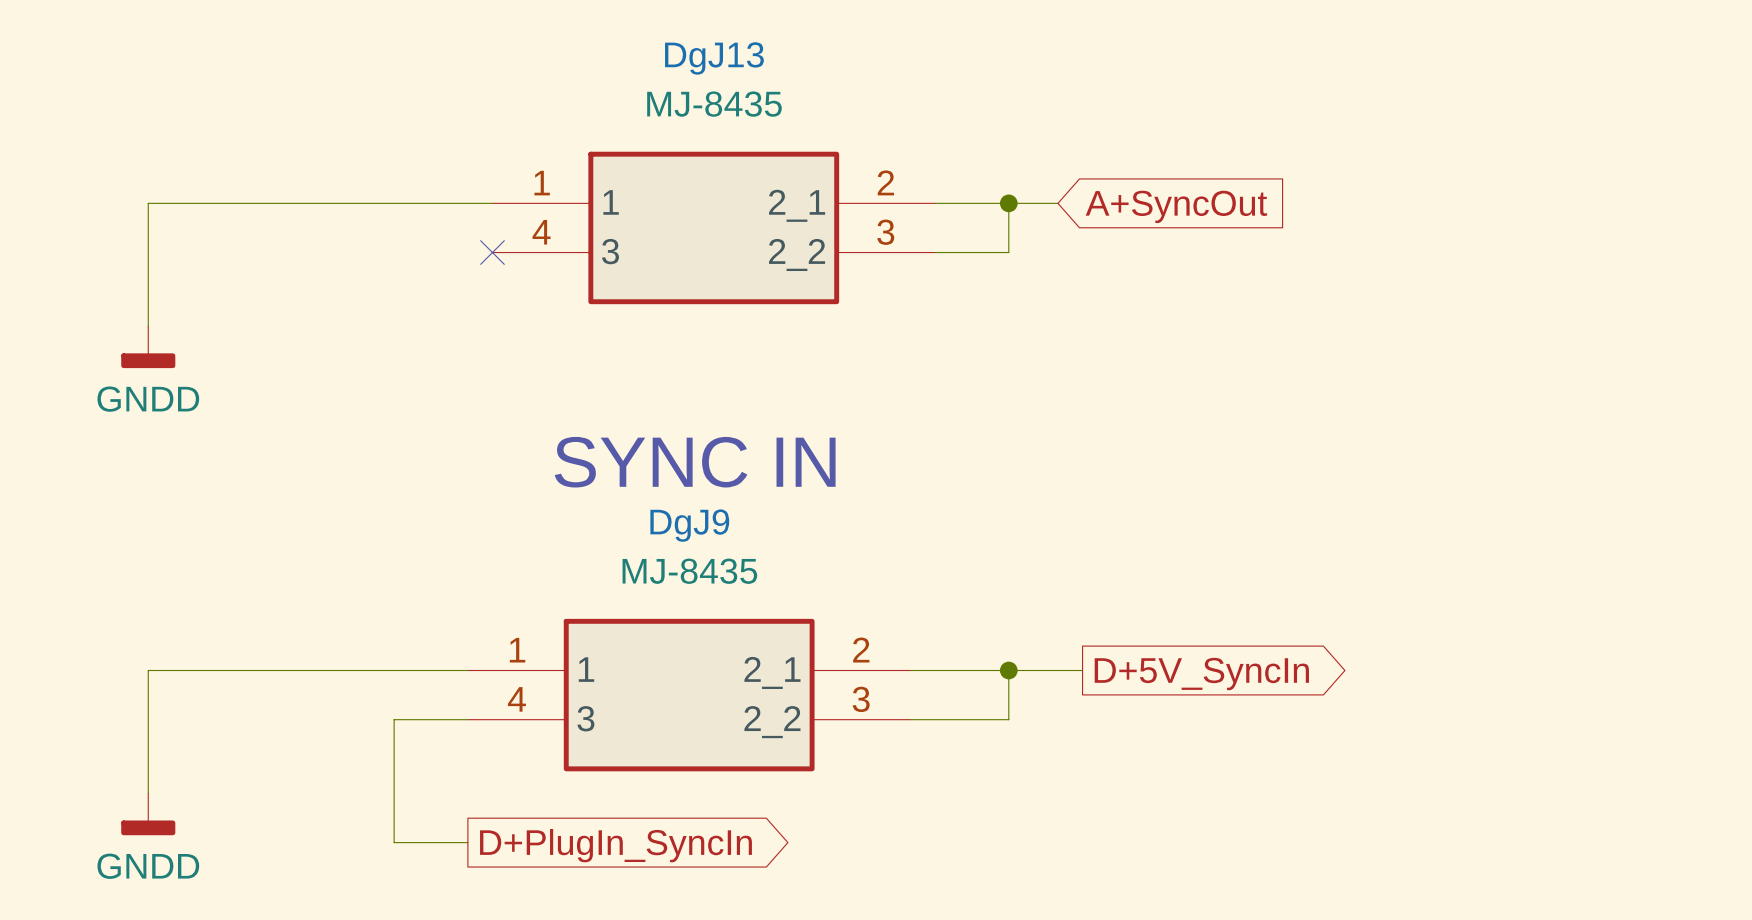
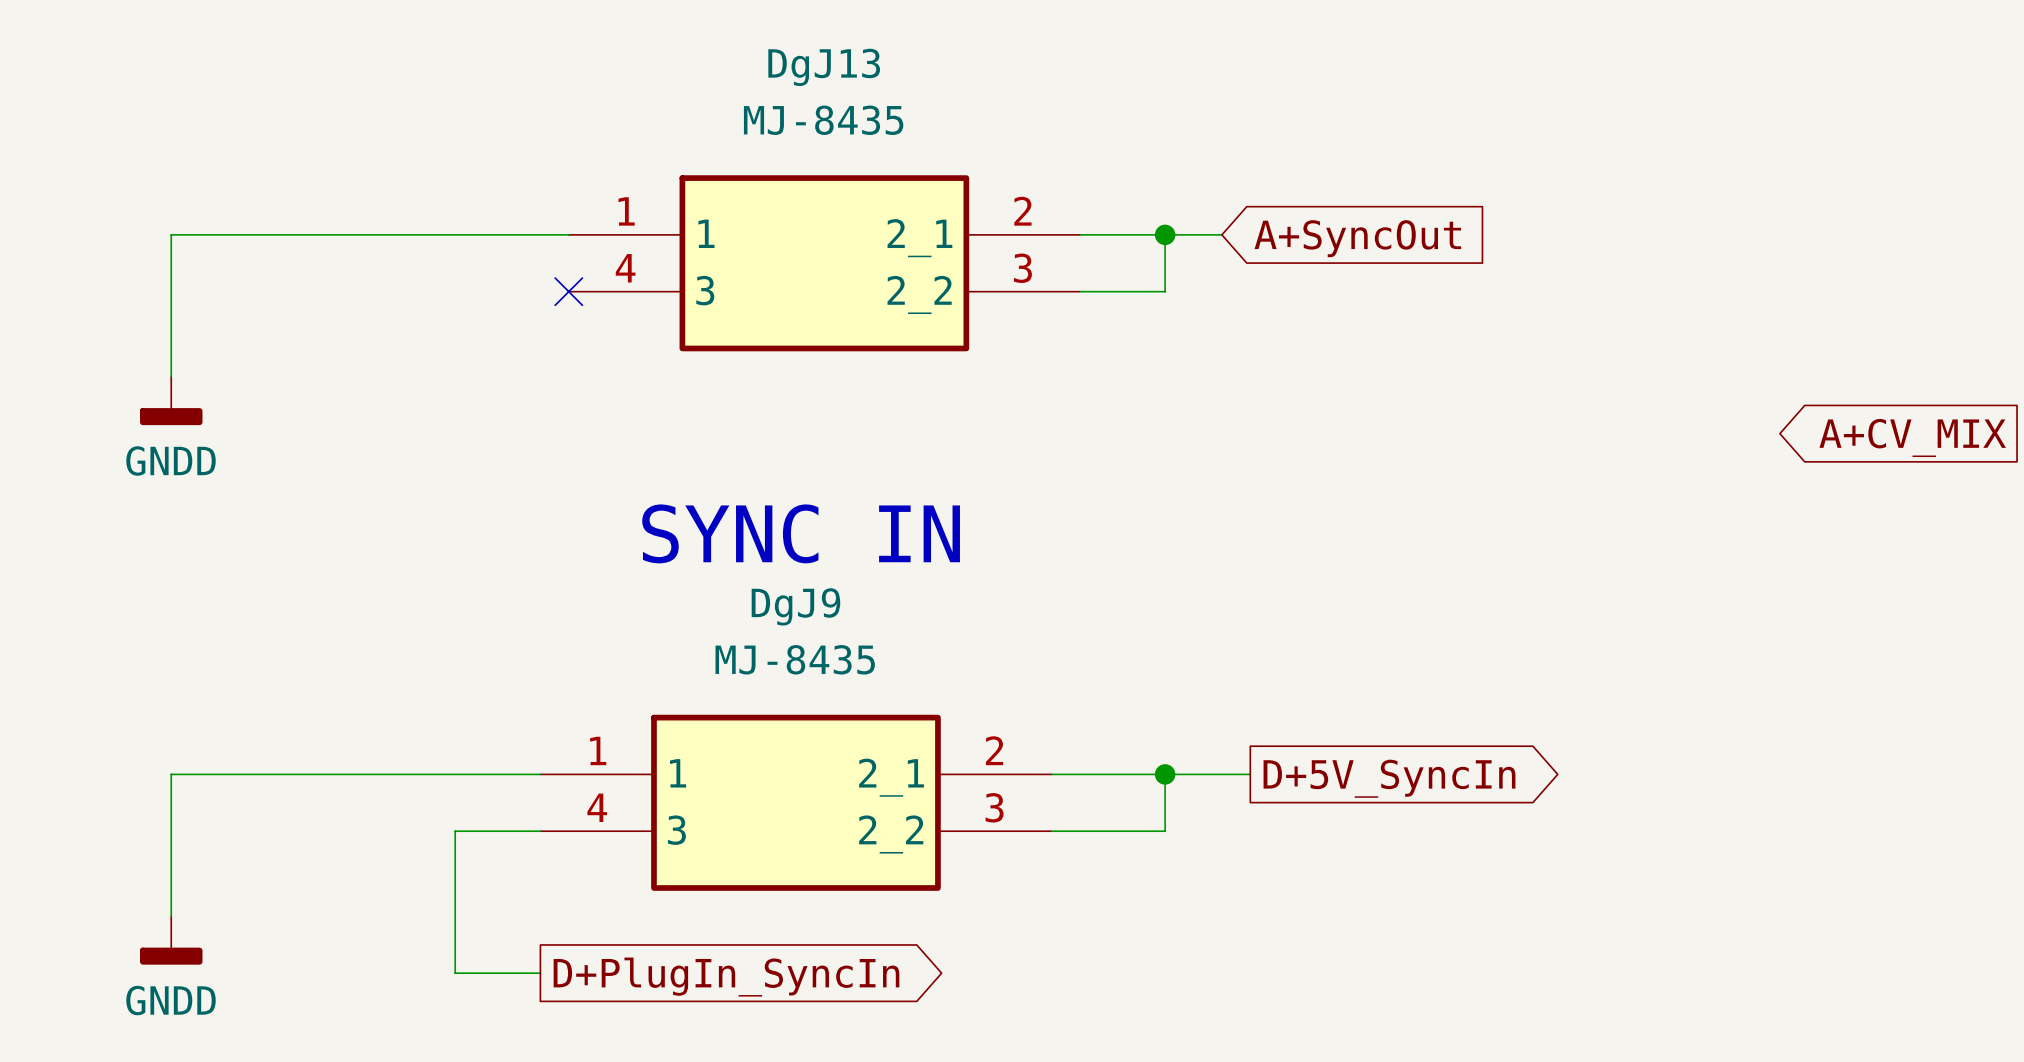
global label: none -> A+CV_MIX (1912, 437)

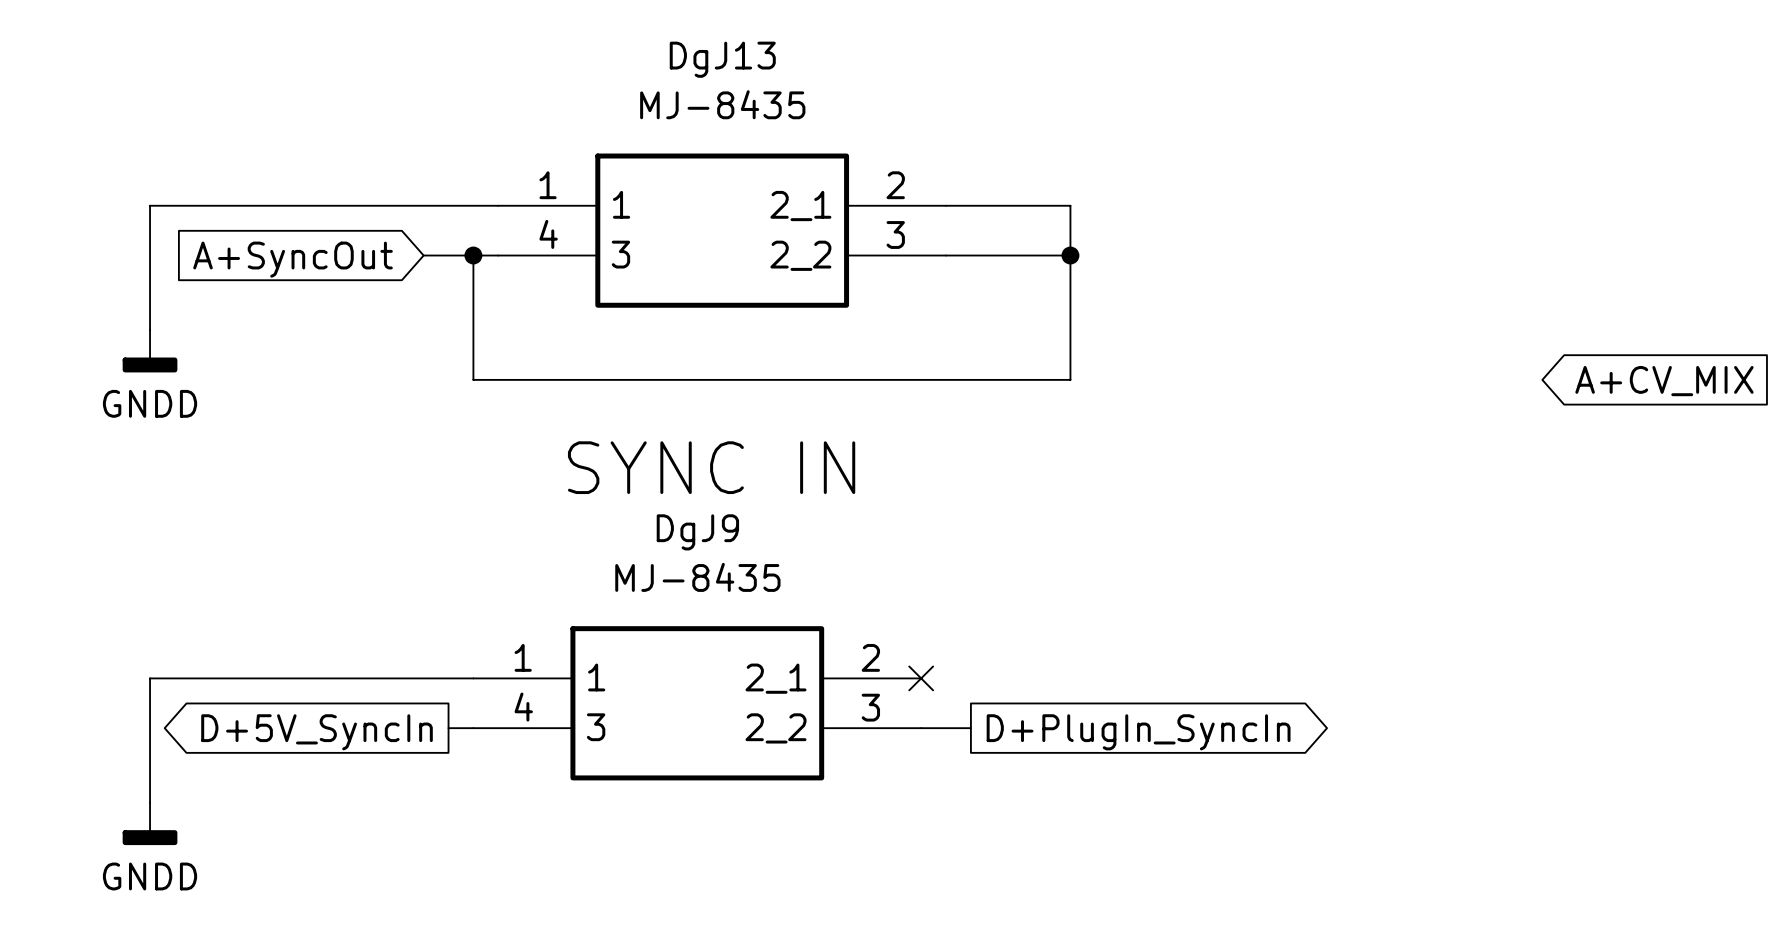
wire: (1165, 234) (1165, 291) -> (1070, 255) (1020, 255)
junction position: (1165, 234) -> (1070, 255)
wire: none -> (1070, 205) (1070, 379) (473, 379) (473, 255)
global label: A+SyncOut (1357, 238) -> none
wire: none -> (423, 255) (498, 255)
junction: none -> (473, 255)
no-connect mark: (568, 291) -> none
global label: none -> A+SyncOut (293, 259)
wire: (1051, 774) (1250, 774) -> none
no-connect mark: none -> (921, 678)
wire: (1165, 774) (1165, 831) (1108, 831) -> none
junction: (1165, 774) -> none
global label: D+5V_SyncIn (1389, 778) -> D+PlugIn_SyncIn (1138, 732)
wire: (512, 831) (455, 831) (455, 973) (540, 973) -> none
global label: none -> D+5V_SyncIn (317, 732)
global label: D+PlugIn_SyncIn (726, 977) -> none

